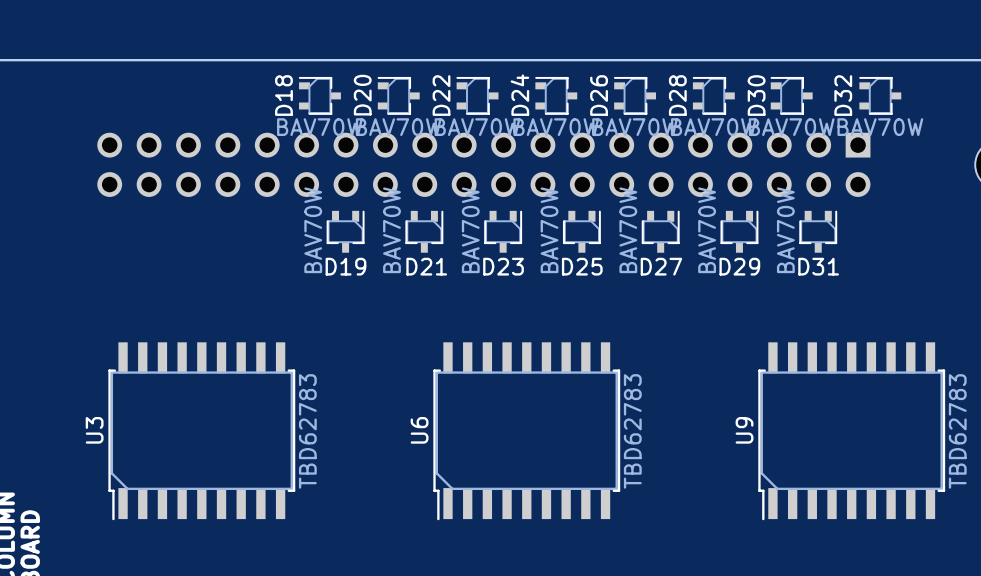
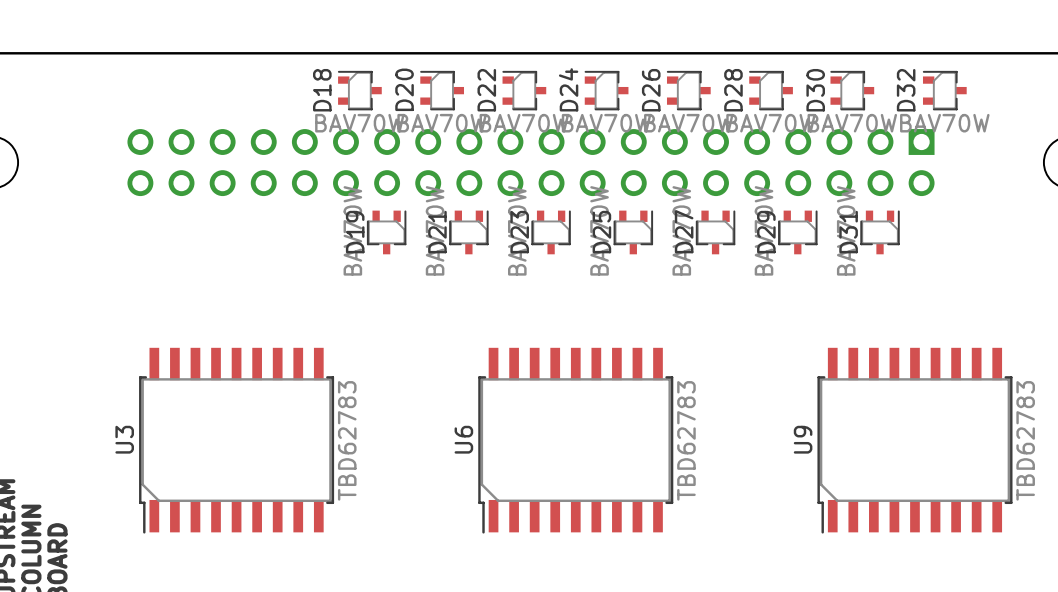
D19 name rotation: 0° (345, 266) -> 90° counterclockwise (355, 232)
D21 name rotation: 0° (426, 266) -> 90° counterclockwise (437, 232)
D23 name rotation: 0° (503, 266) -> 90° counterclockwise (519, 232)
D25 name rotation: 0° (582, 266) -> 90° counterclockwise (601, 232)
D27 name rotation: 0° (661, 266) -> 90° counterclockwise (684, 231)
D29 name rotation: 0° (739, 266) -> 90° counterclockwise (766, 232)
D31 name rotation: 0° (818, 266) -> 90° counterclockwise (848, 232)

